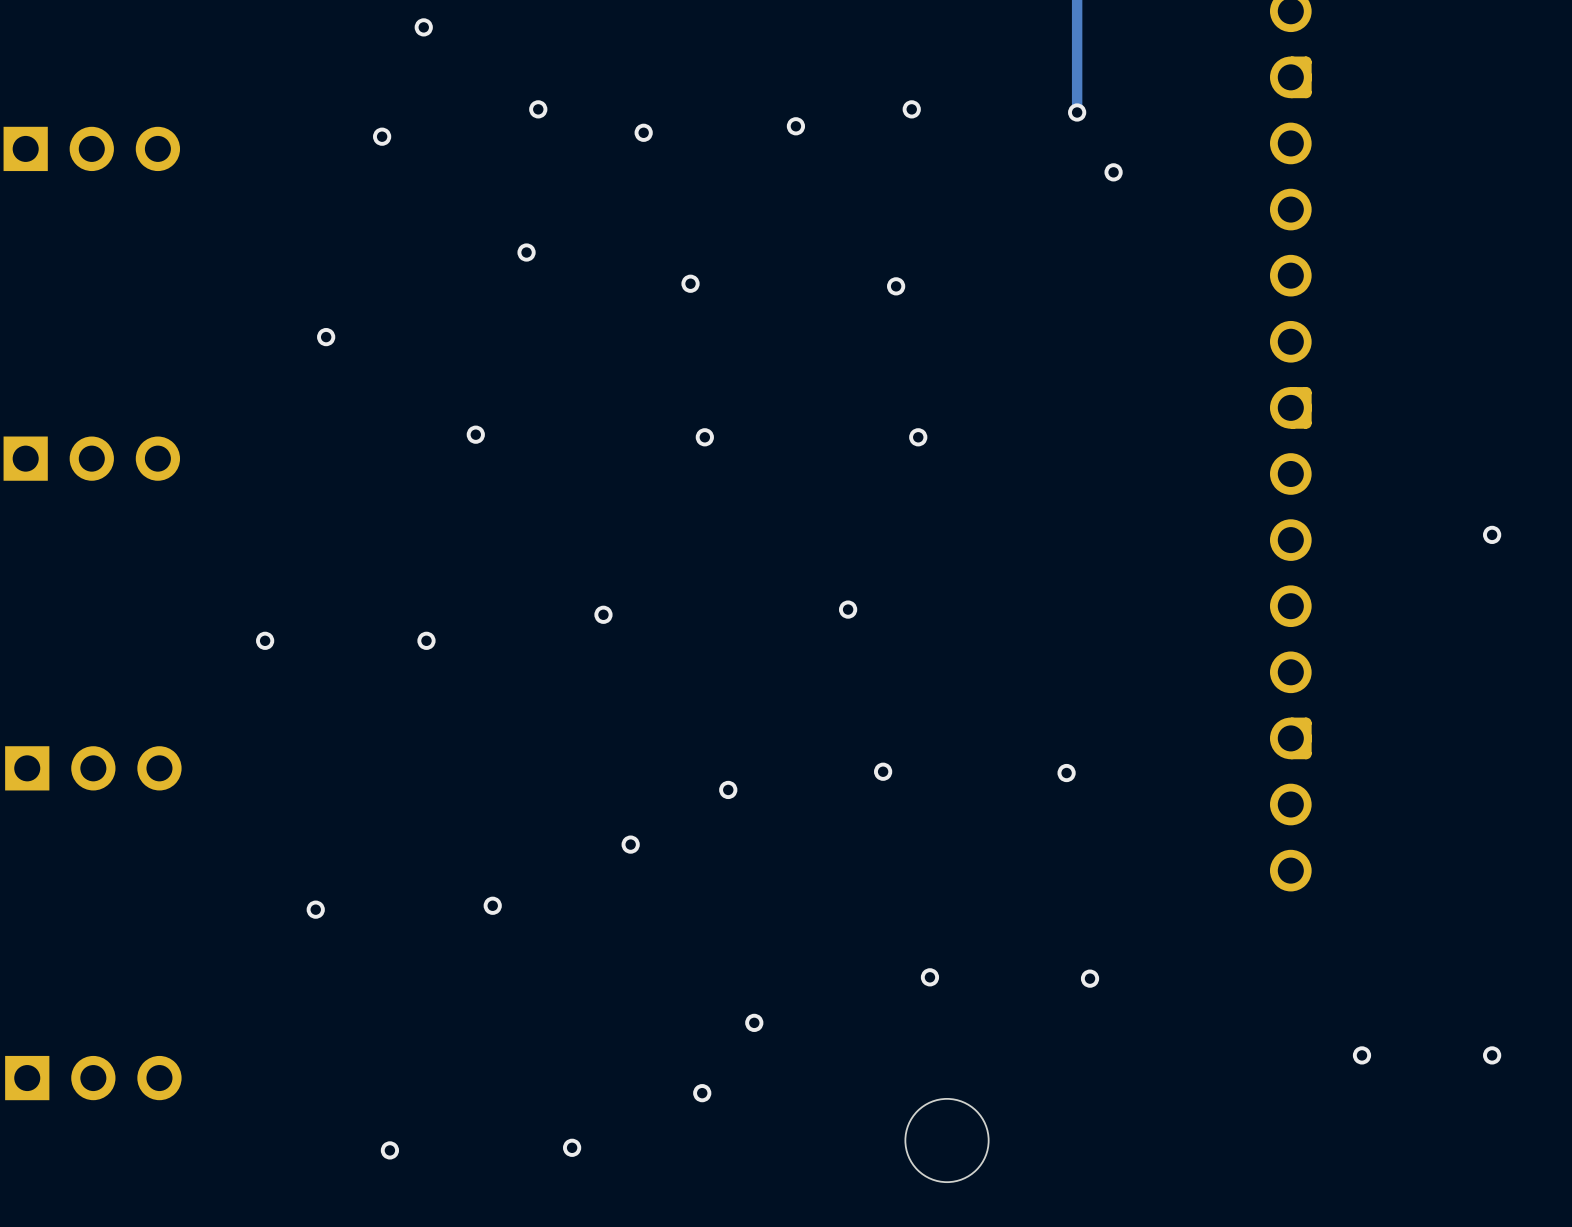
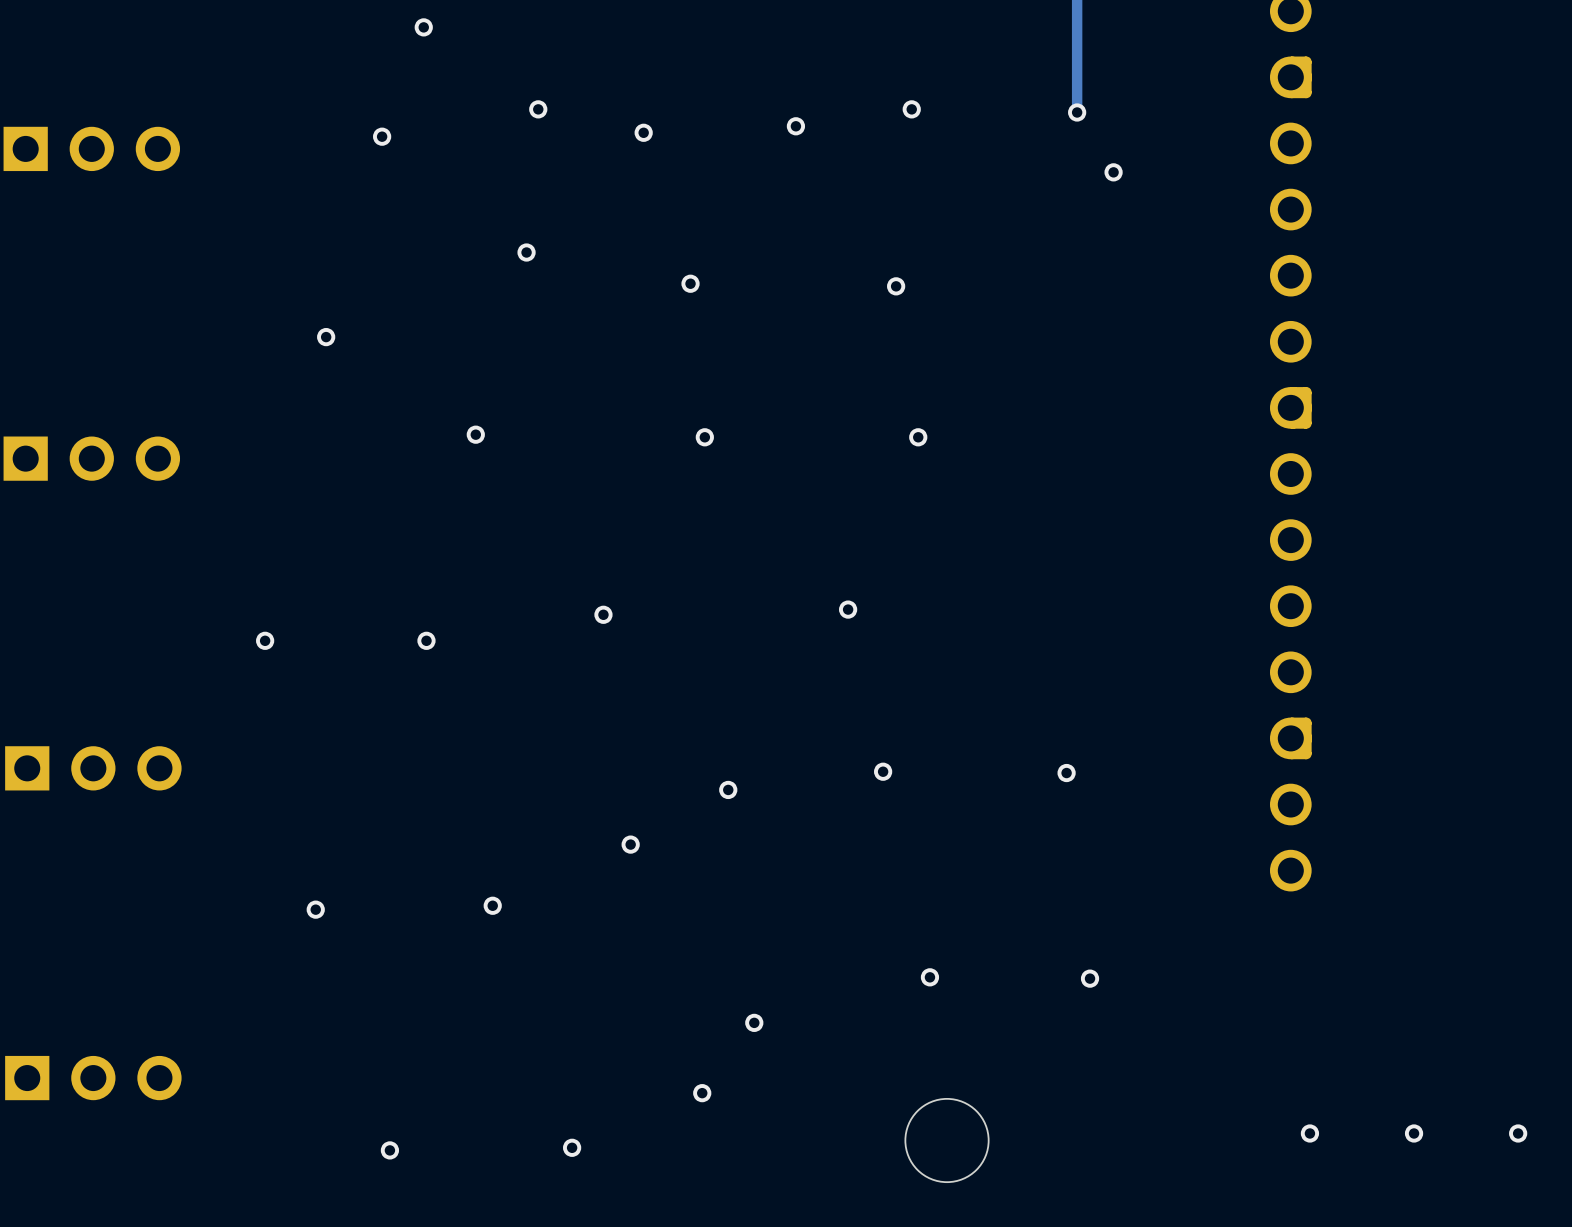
via: (1492, 534) -> none
via: (1361, 1055) -> none
via: (1492, 1055) -> none
via: none -> (1309, 1133)
via: none -> (1414, 1133)
via: none -> (1518, 1133)

